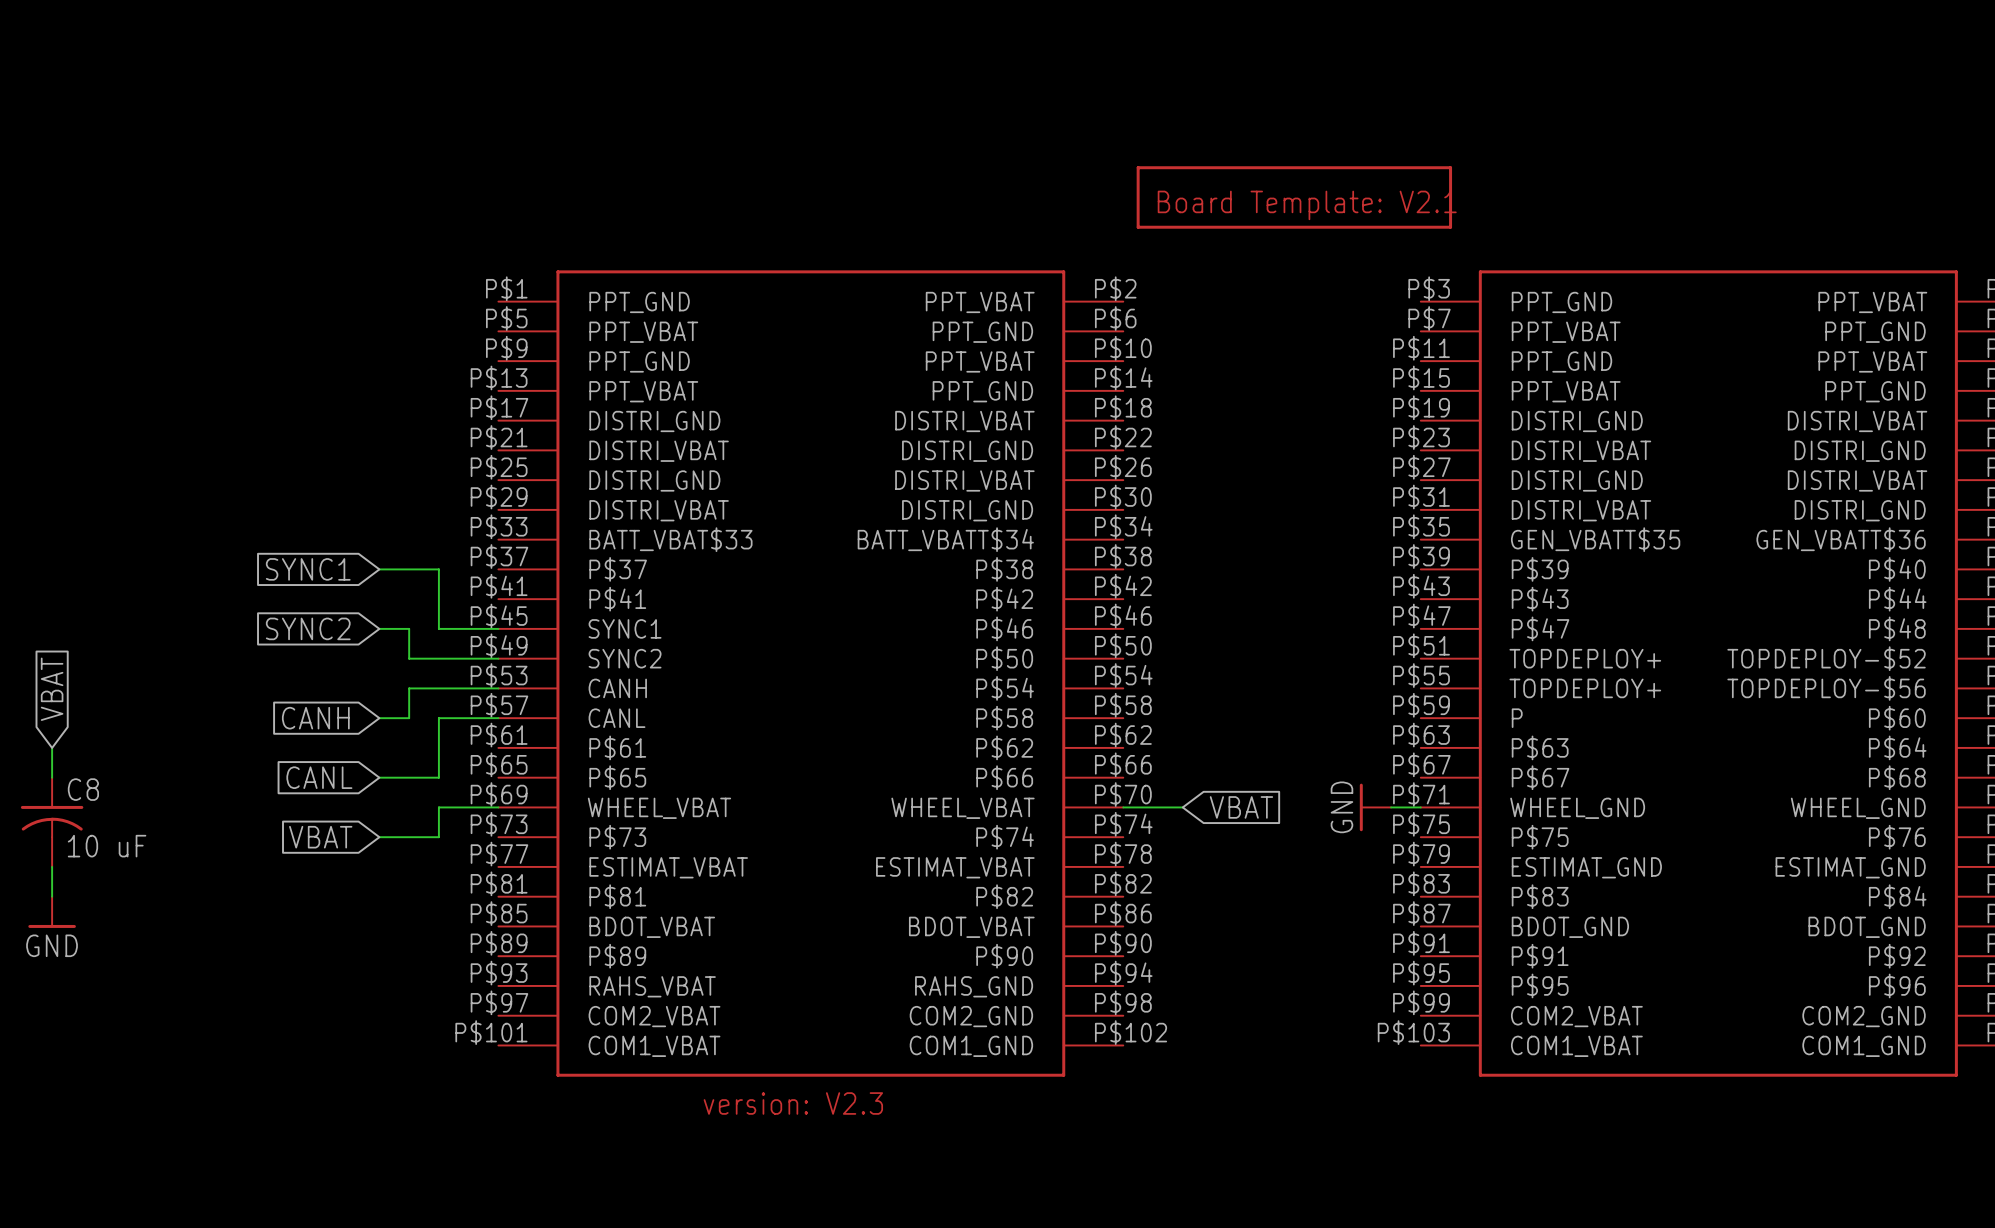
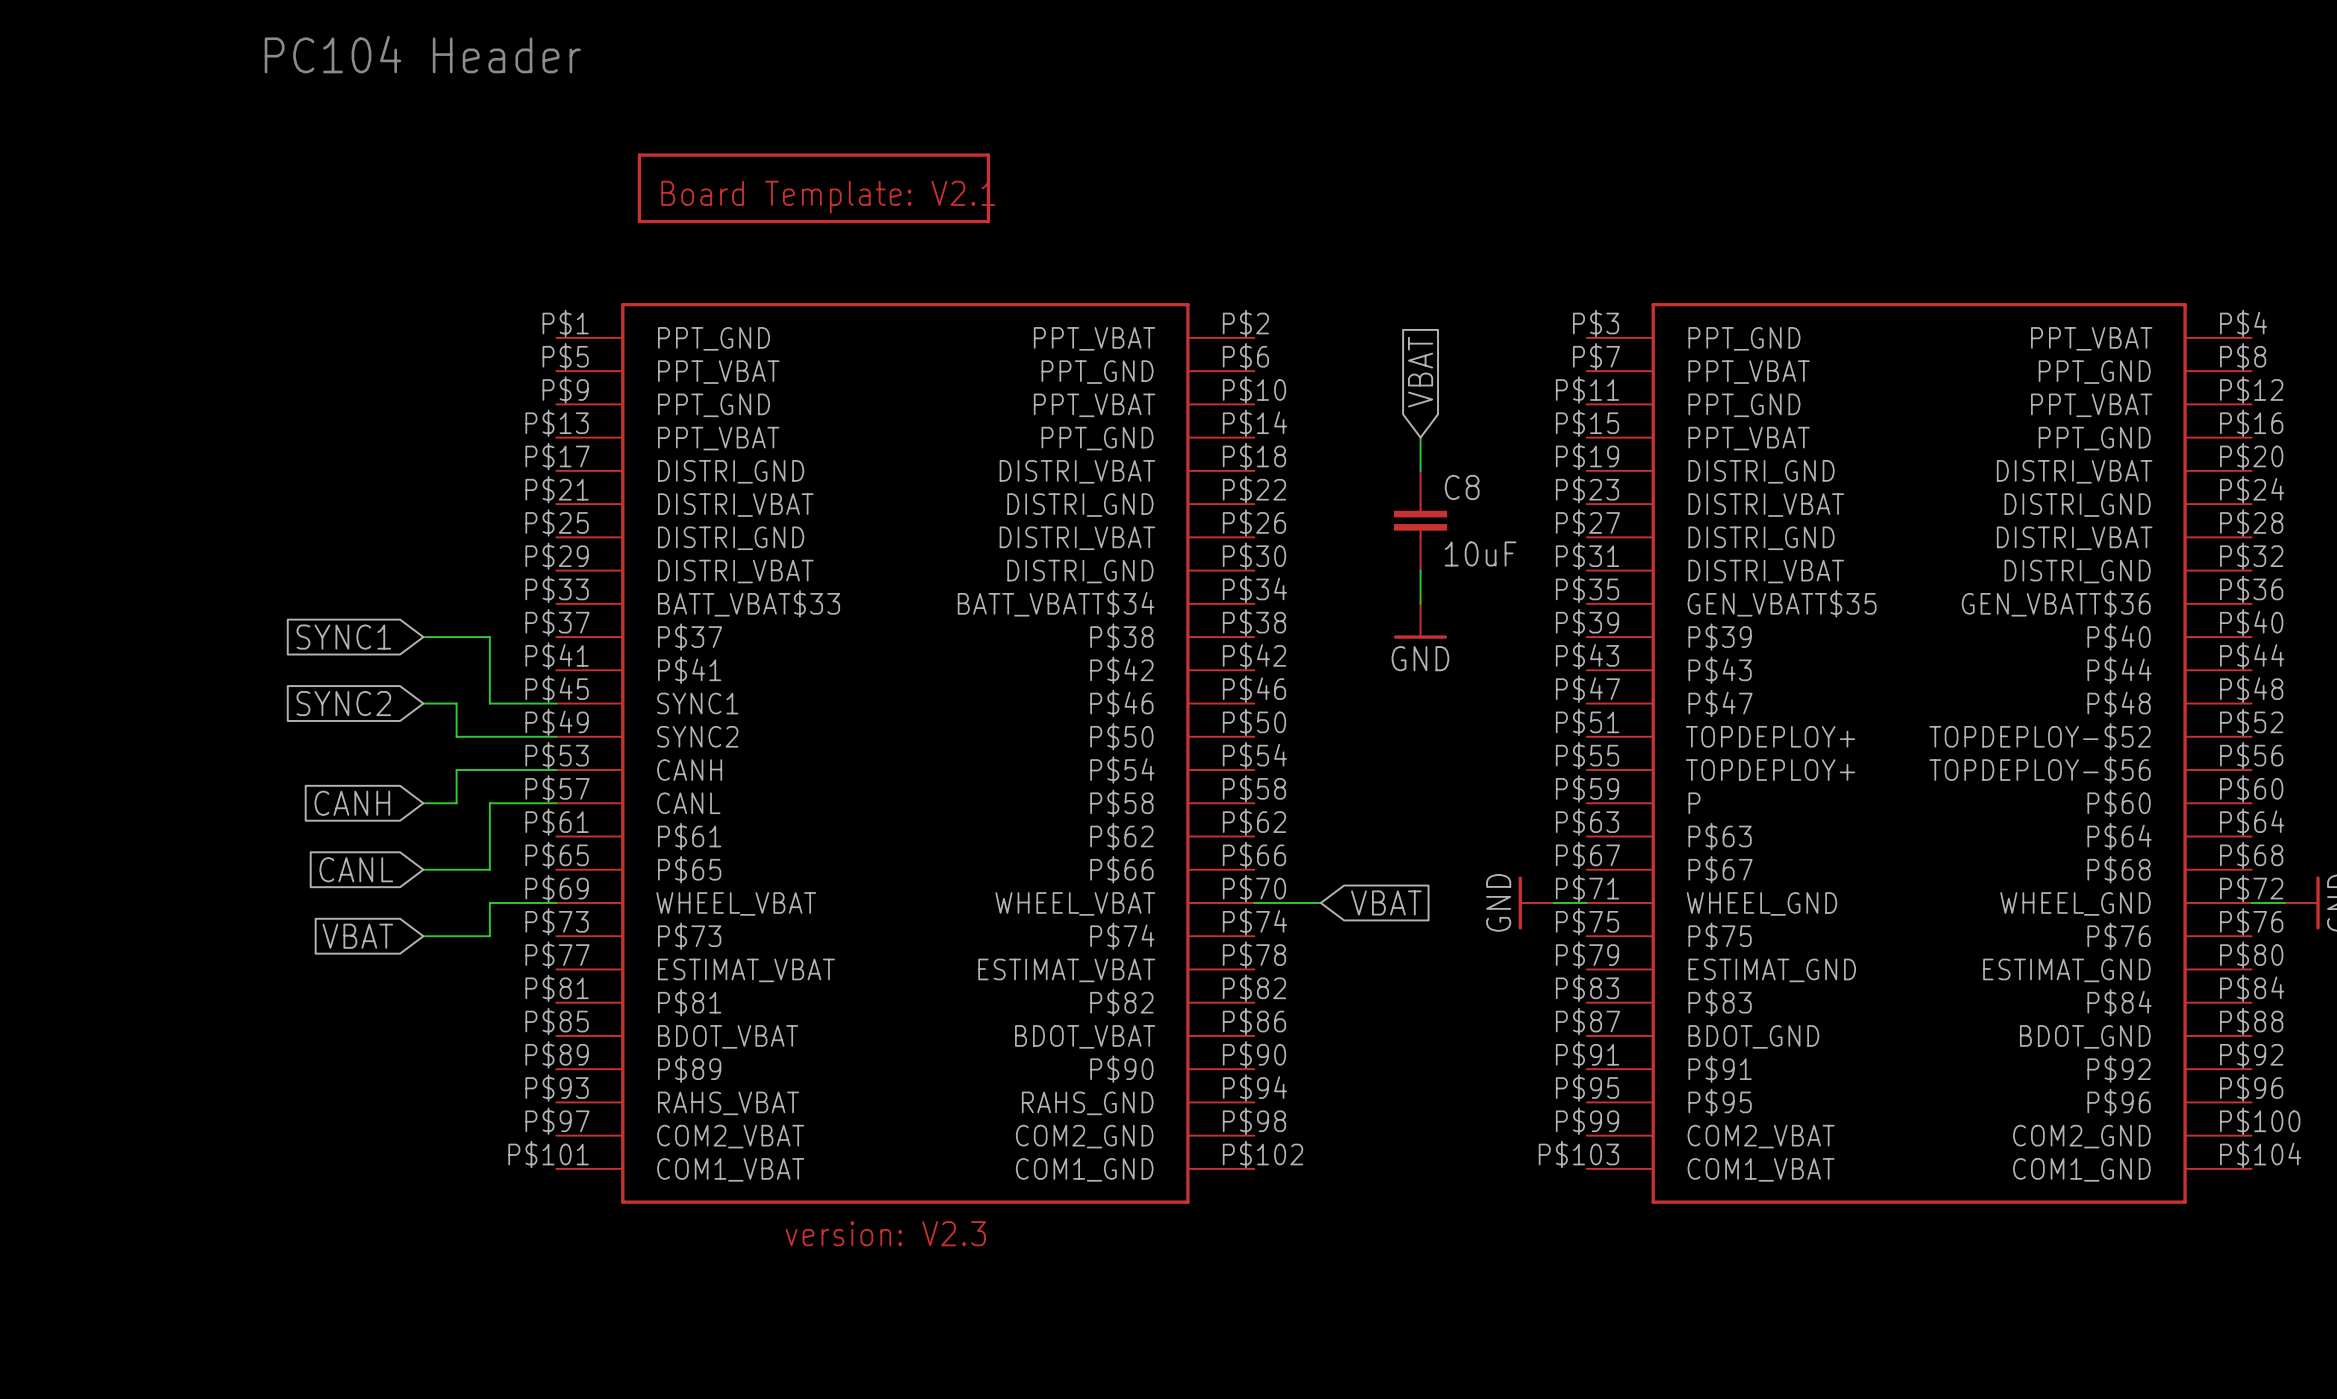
text: none -> PC104 Header (422, 54)
part: none -> (813, 188)
part: (1294, 197) -> none
global label: none -> VBAT (1420, 372)
wire: none -> (1420, 437) (1420, 470)
wire: none -> (1420, 570) (1420, 603)
power symbol: none -> GND (1420, 621)
global label: VBAT (52, 689) -> none
wire: (52, 747) (52, 777) -> none
C8 symbol: [20, 777, 84, 867] -> [1393, 470, 1448, 571]
C8 value: 10 uF (107, 846) -> 10uF (1480, 553)
wire: (52, 866) (52, 896) -> none
power symbol: GND (52, 912) -> none

